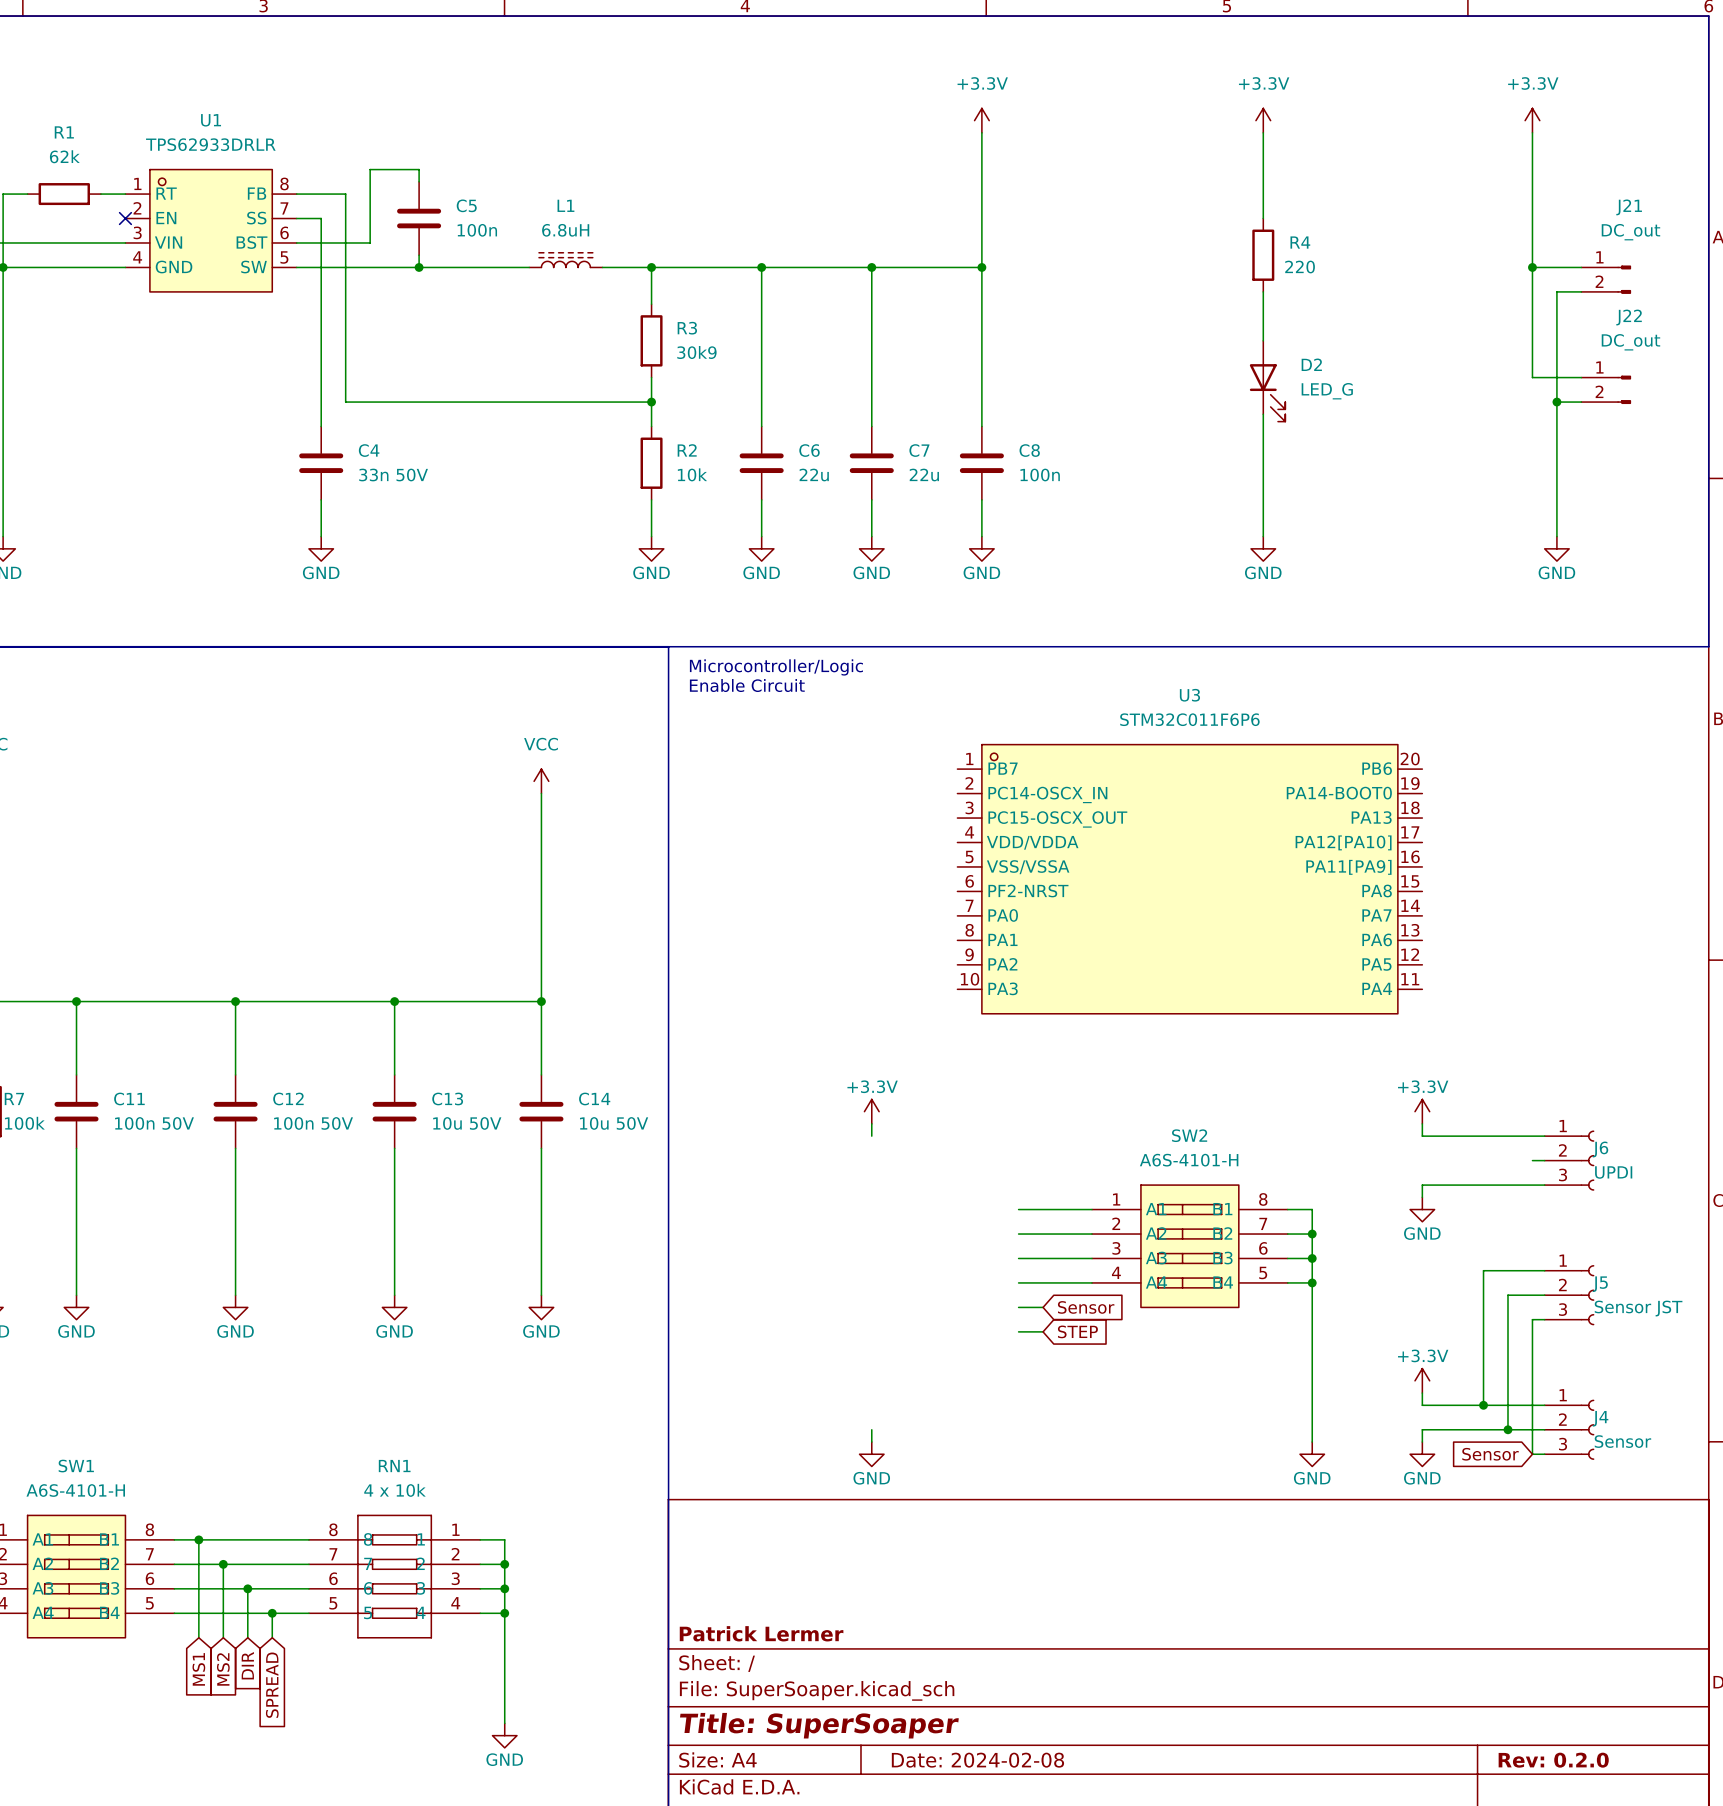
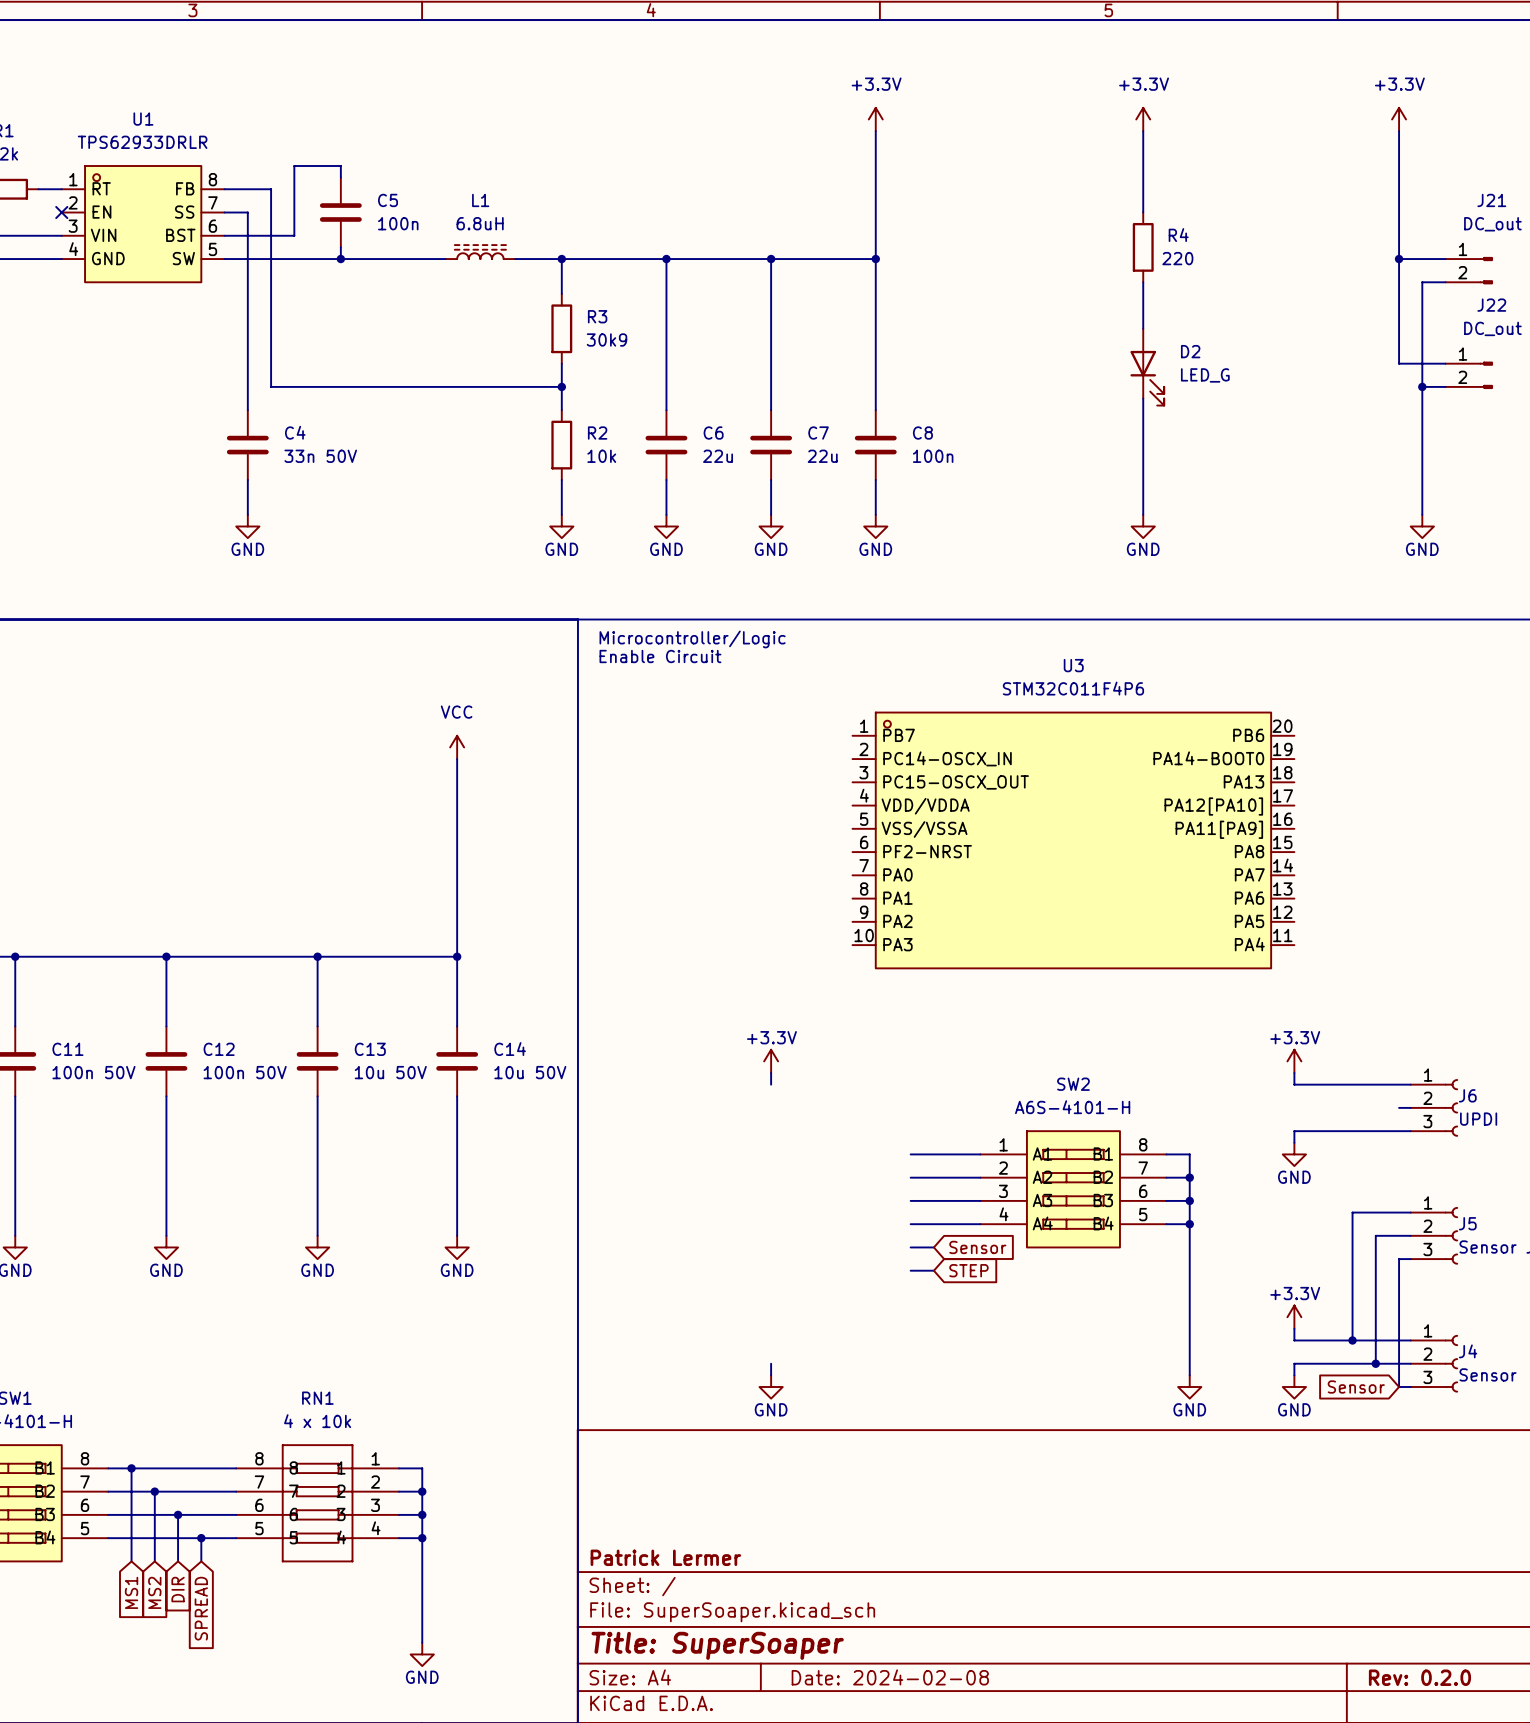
U3 value: STM32C011F6P6 (1189, 719) -> STM32C011F4P6 (1073, 688)

